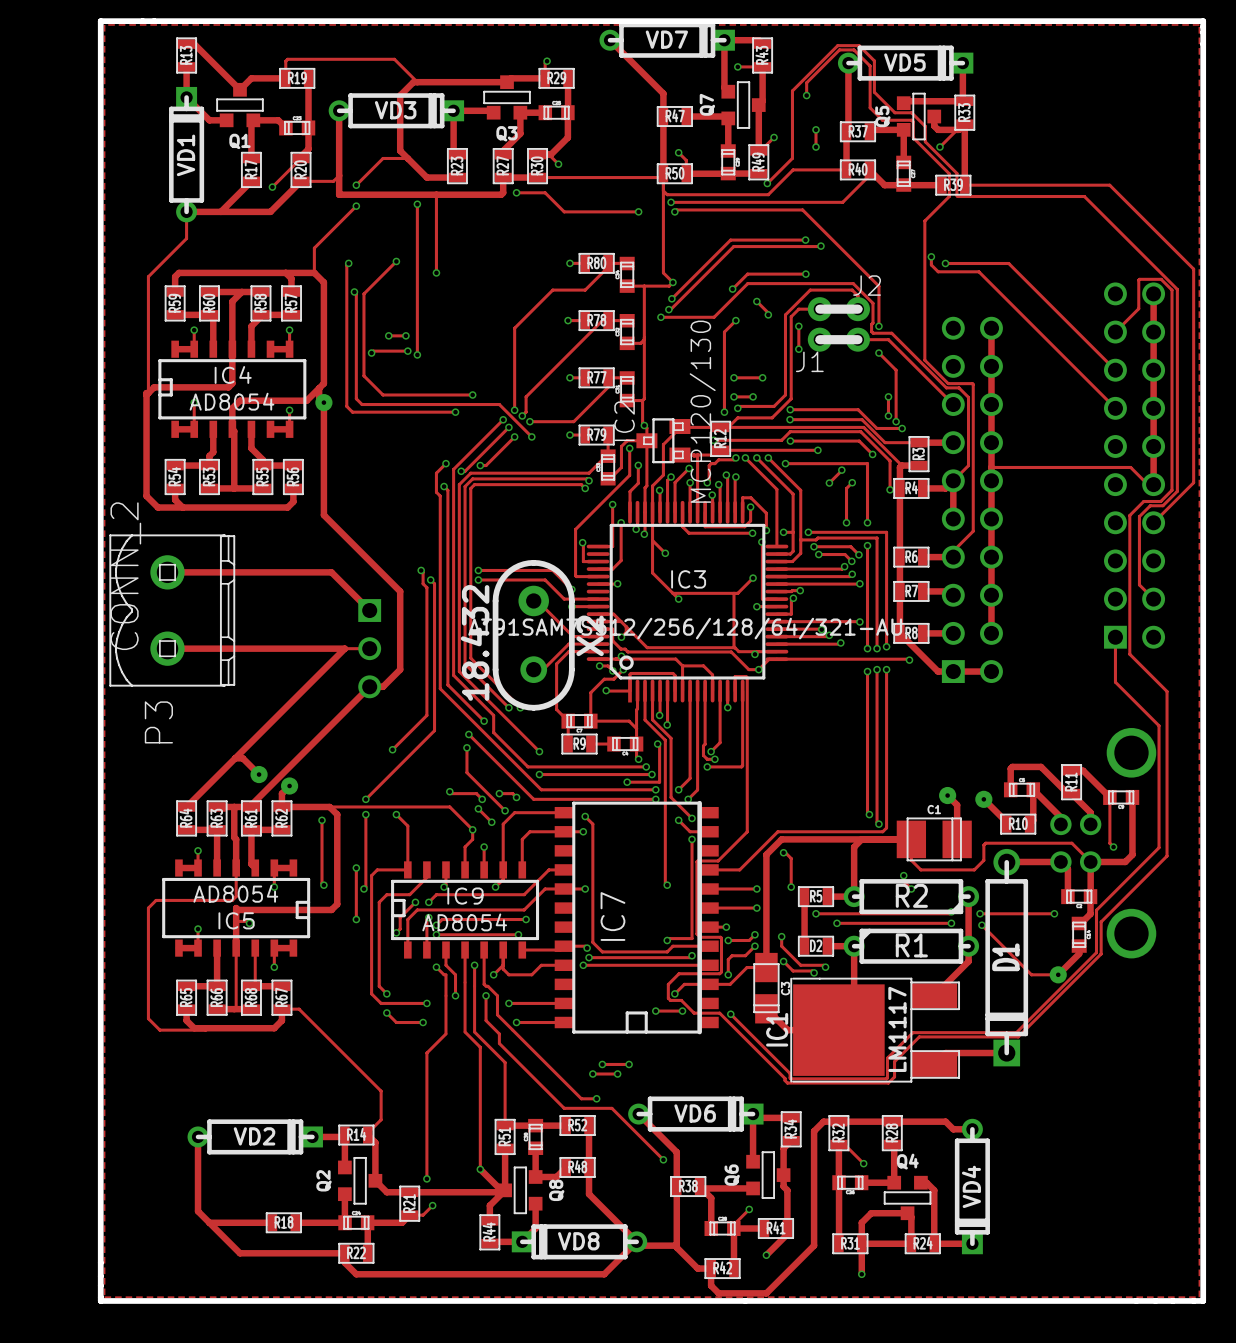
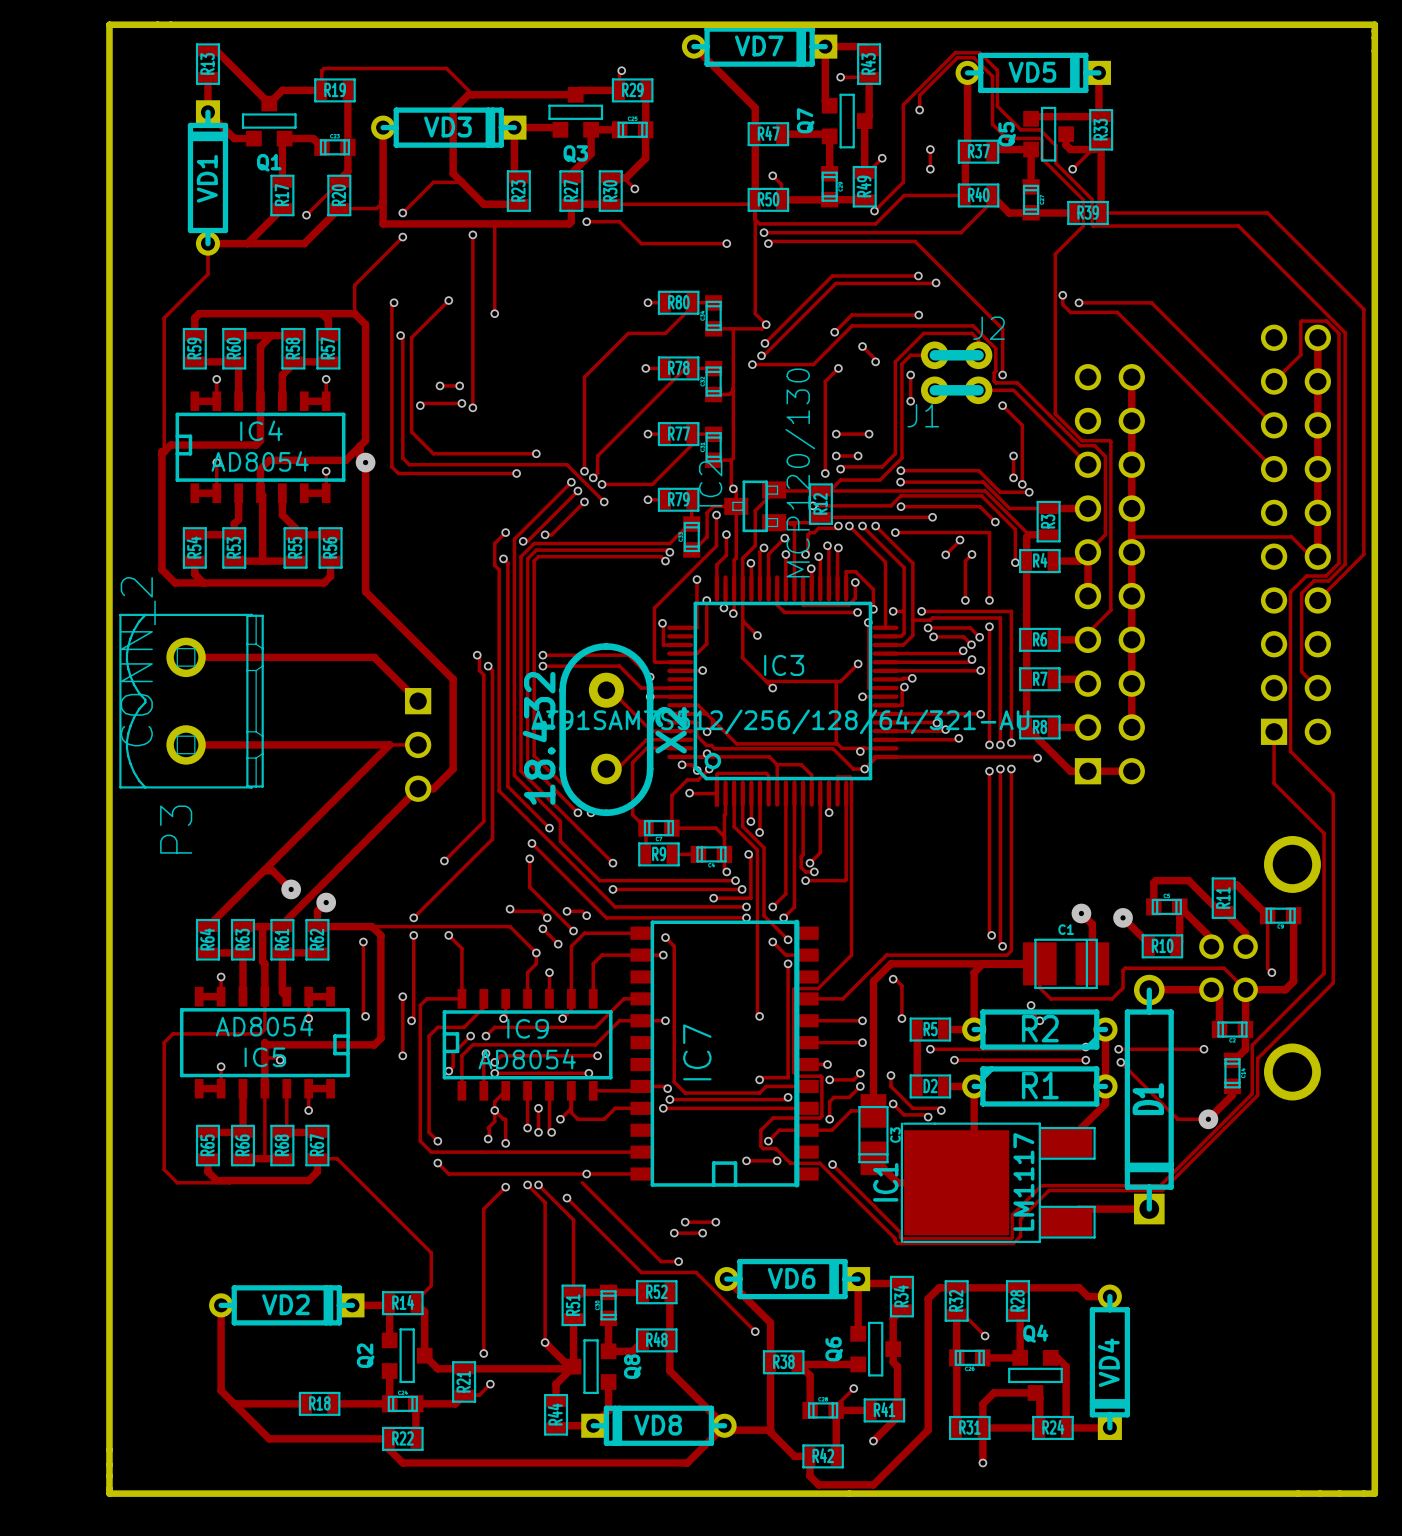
zone outline: (104, 24) (1199, 24) (1199, 1297) (104, 1297) (104, 24) -> none
track: (445, 950) (445, 965) (455, 974) (455, 995) -> (505, 1090) (494, 1101) (494, 1121) (488, 1128)
track: none -> (489, 1126) (488, 1138)
track: (465, 982) (465, 1032) -> none
via: none -> (527, 1128)
track: (474, 986) (474, 1032) -> none
via: none -> (538, 1132)
track: (486, 986) (497, 995) (497, 1014) (512, 1030) -> none
via: none -> (551, 1132)
via: none -> (488, 1138)
track: (445, 995) (445, 1033) -> none
via: none -> (505, 1143)
via: (455, 995) -> none
track: (486, 995) (486, 1020) (499, 1033) (499, 1043) -> none
via: (486, 995) -> none
track: none -> (483, 1152) (577, 1152)
via: (426, 1003) -> none
via: (508, 1003) -> none
track: none -> (479, 1174) (586, 1174)
via: (423, 1022) -> none
via: none -> (527, 1184)
via: none -> (538, 1184)
via: none -> (505, 1187)
via: none -> (566, 1198)

